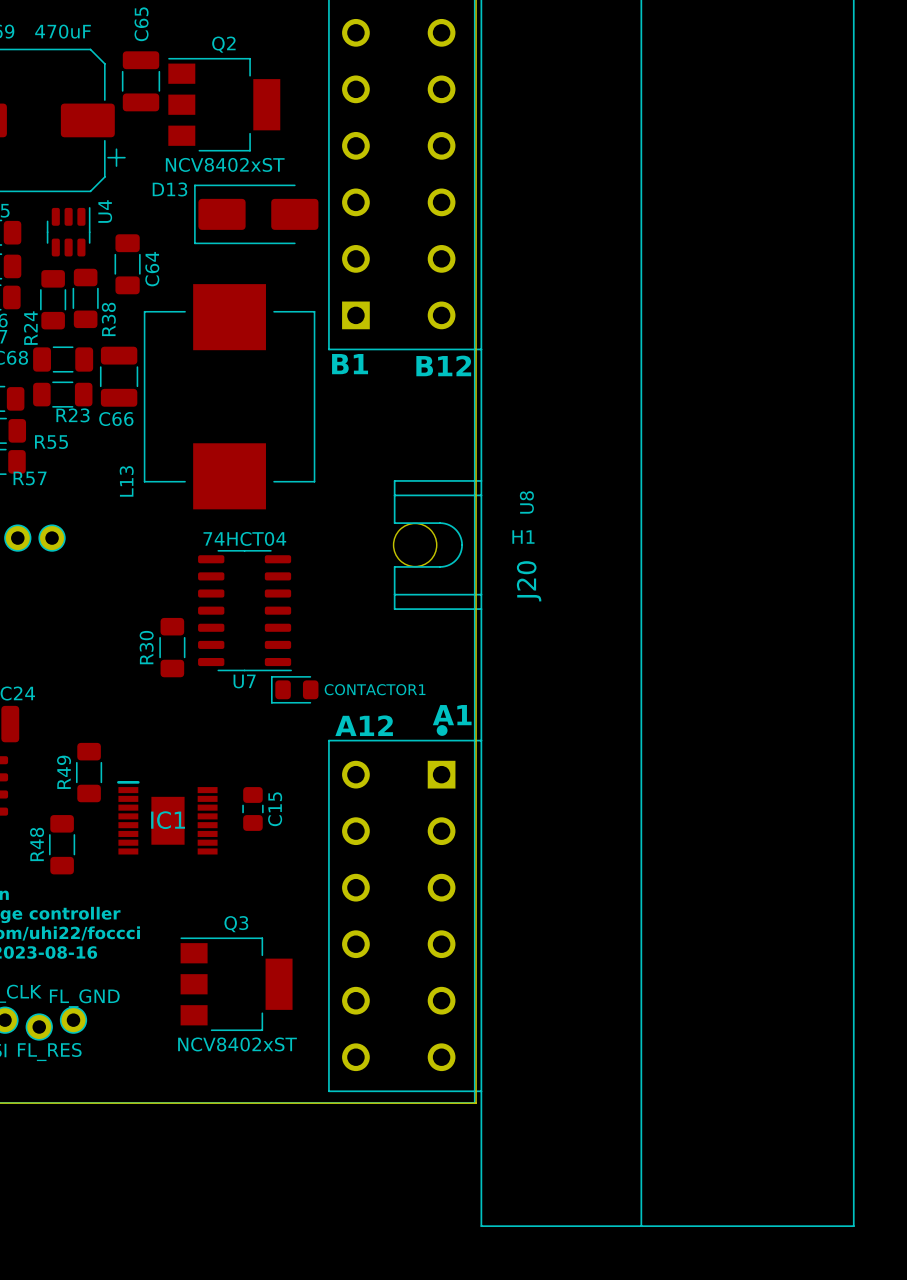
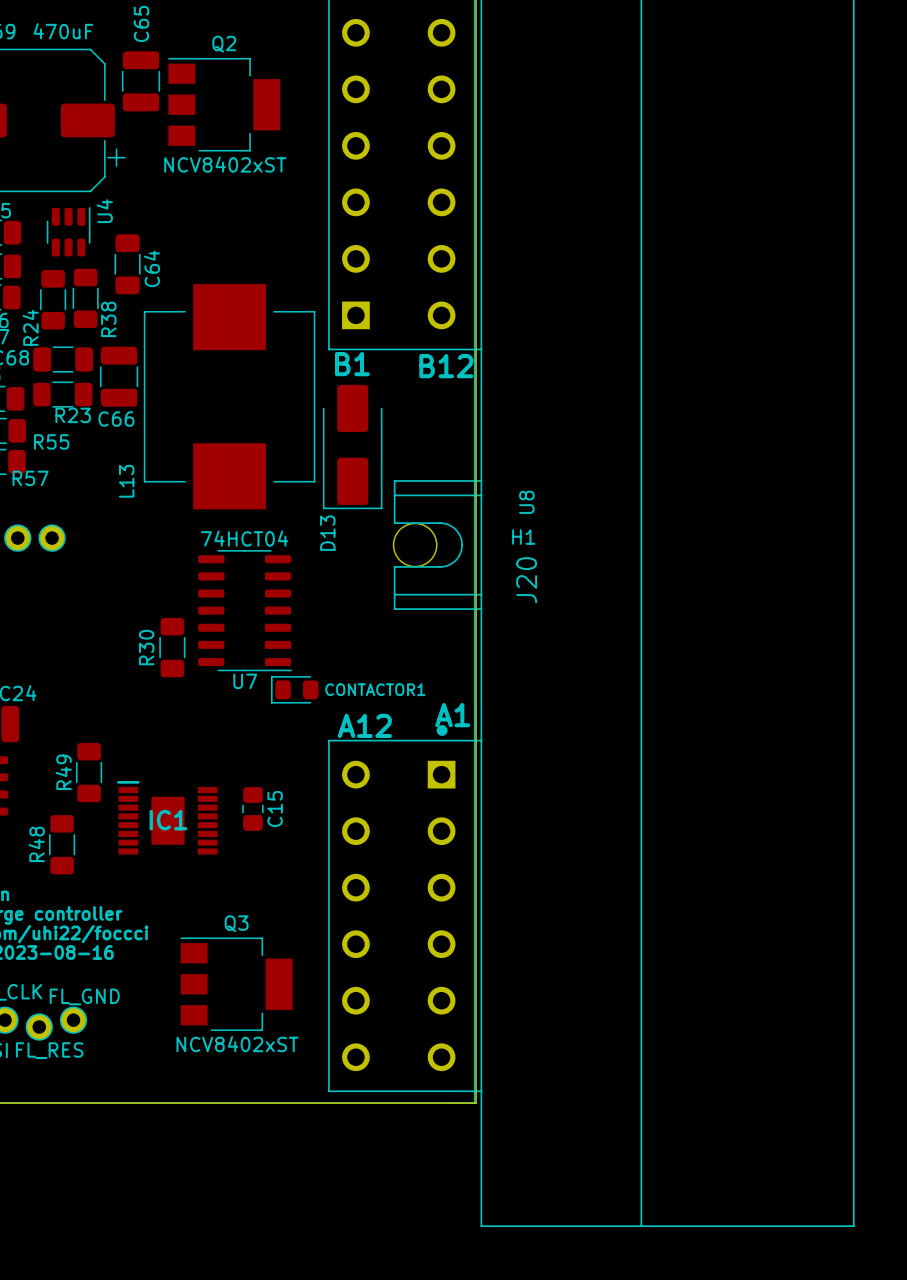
D13 rotation: 0° (256, 214) -> 90° counterclockwise (352, 447)
D13 position: (256, 214) -> (352, 447)

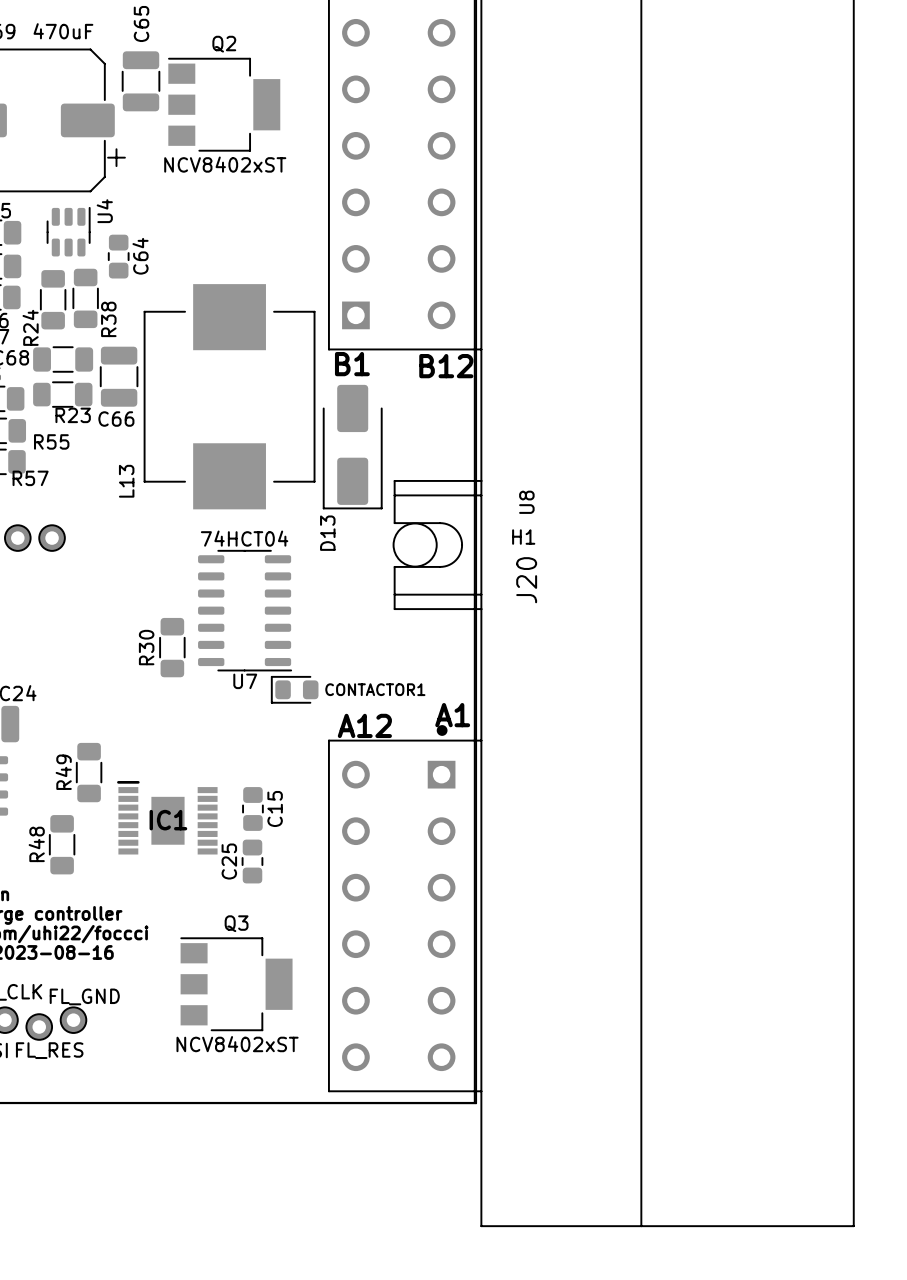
C64 footprint: [114, 234, 141, 295] -> [107, 234, 130, 279]
C25: none -> (252, 861)

